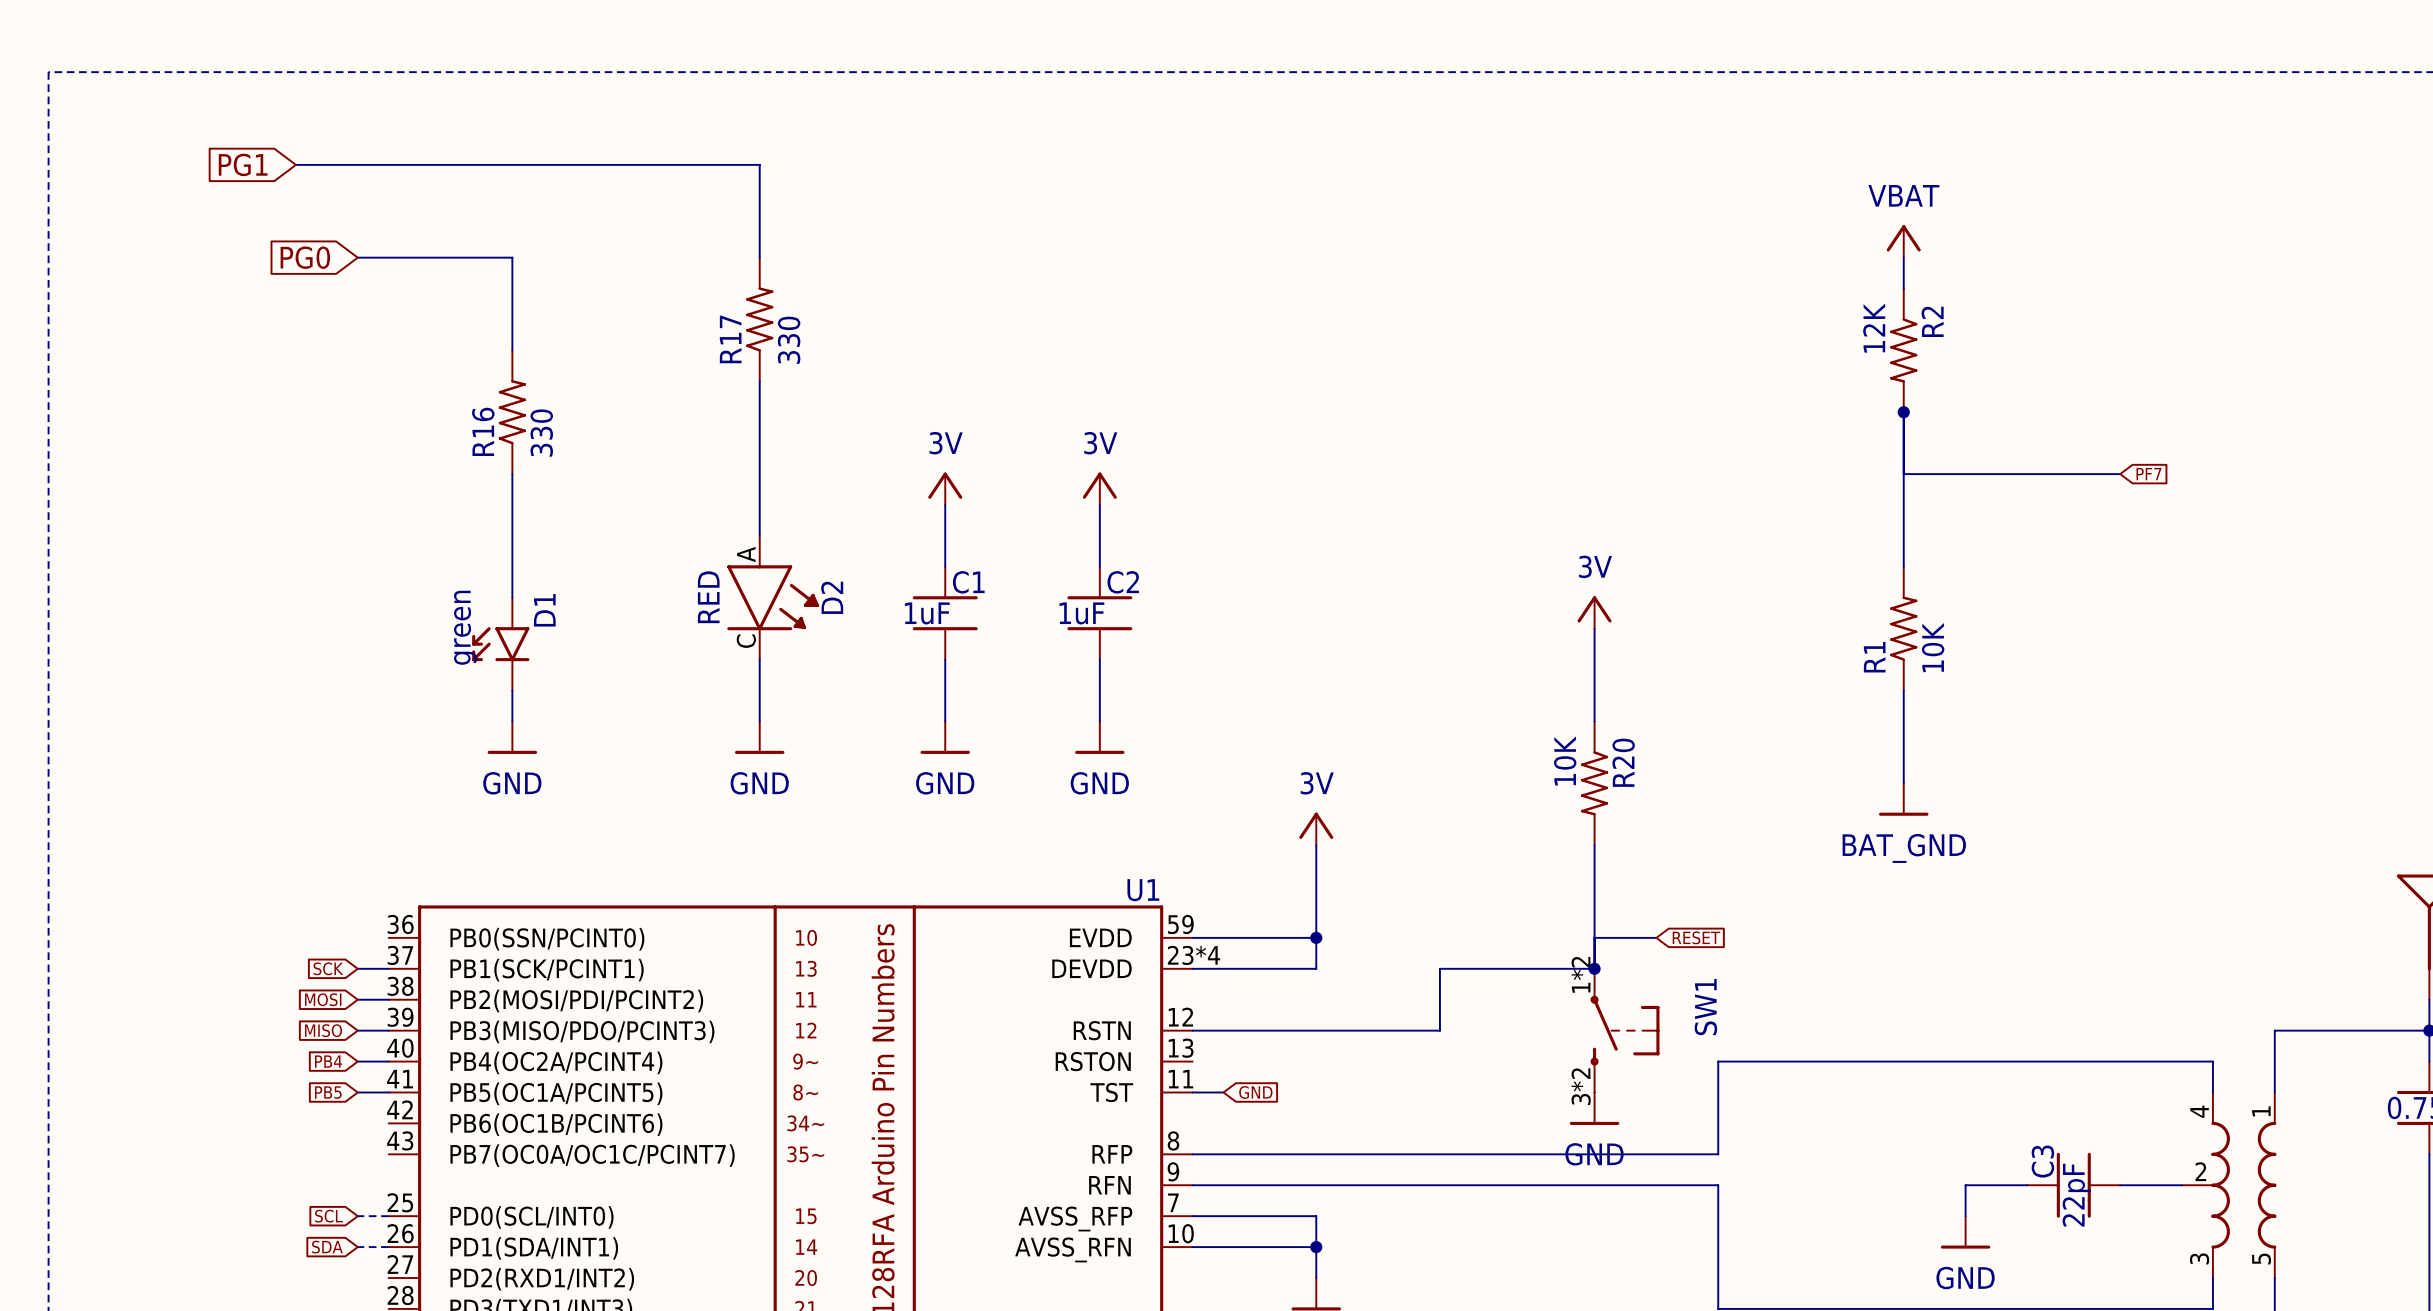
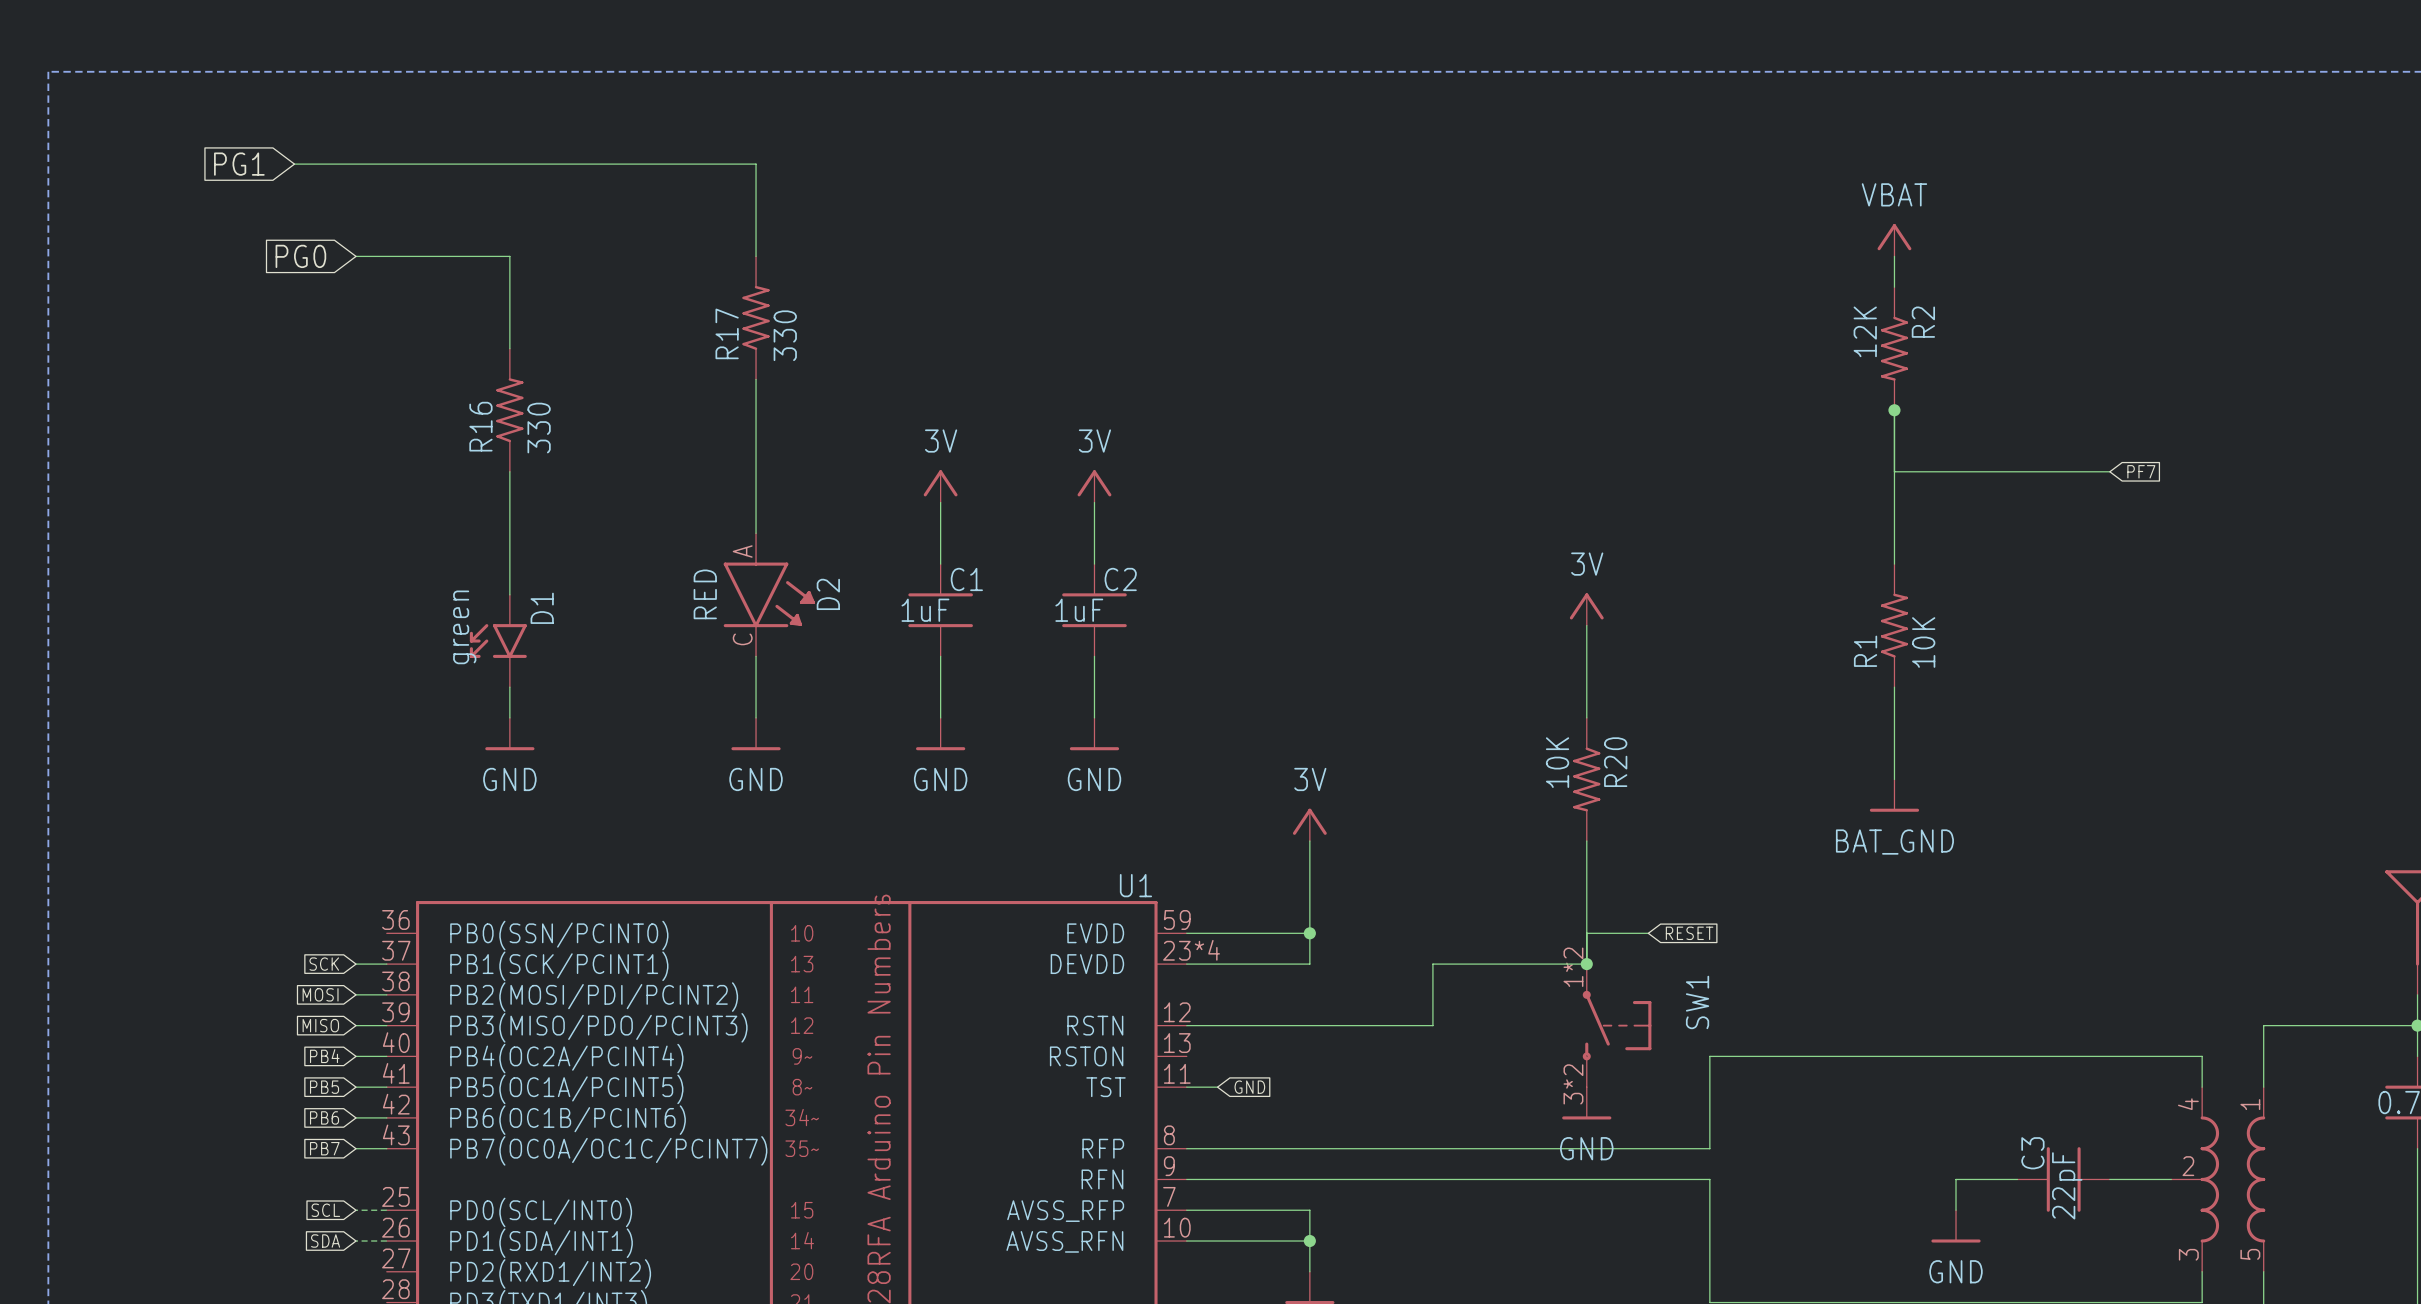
global label: none -> PB6 (324, 1117)
wire: none -> (356, 1117) (386, 1117)
global label: none -> PB7 (324, 1148)
wire: none -> (356, 1148) (386, 1148)

